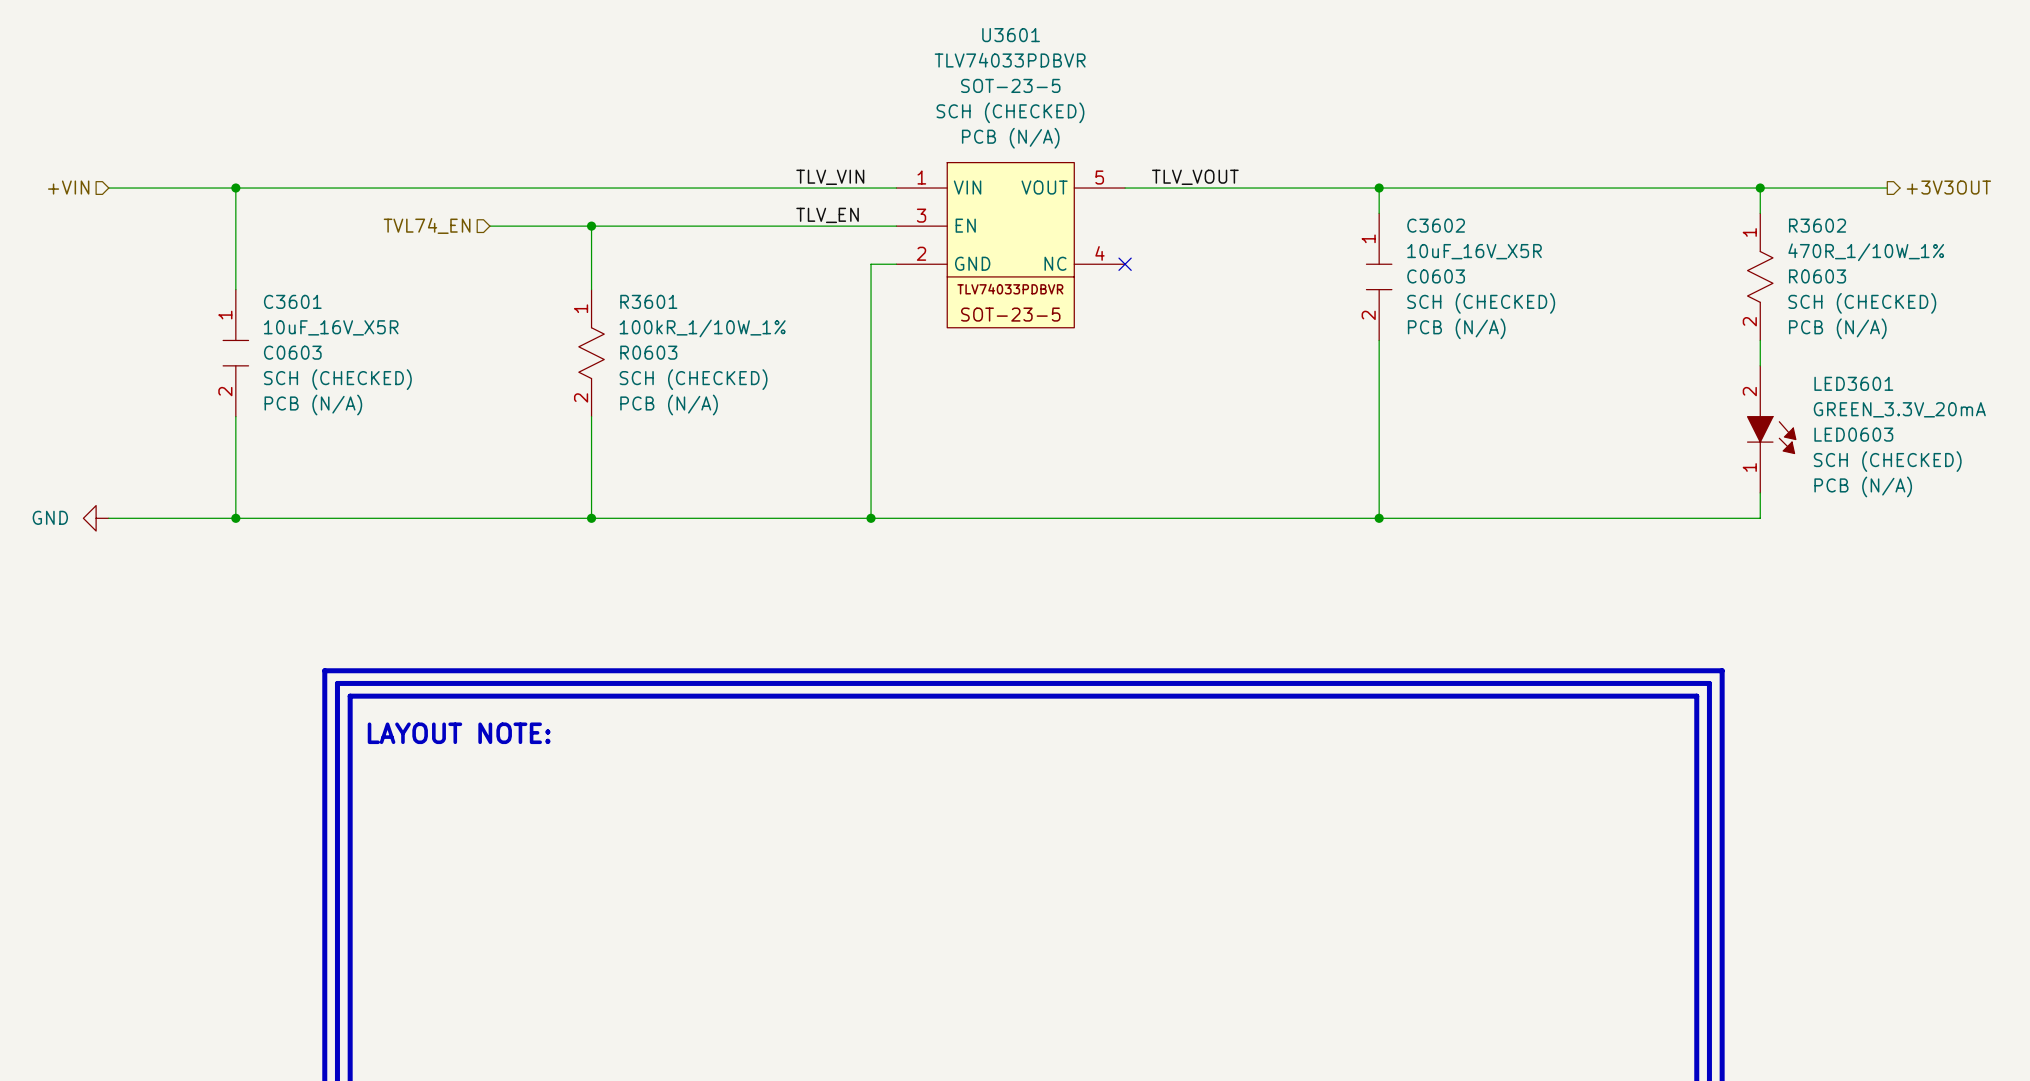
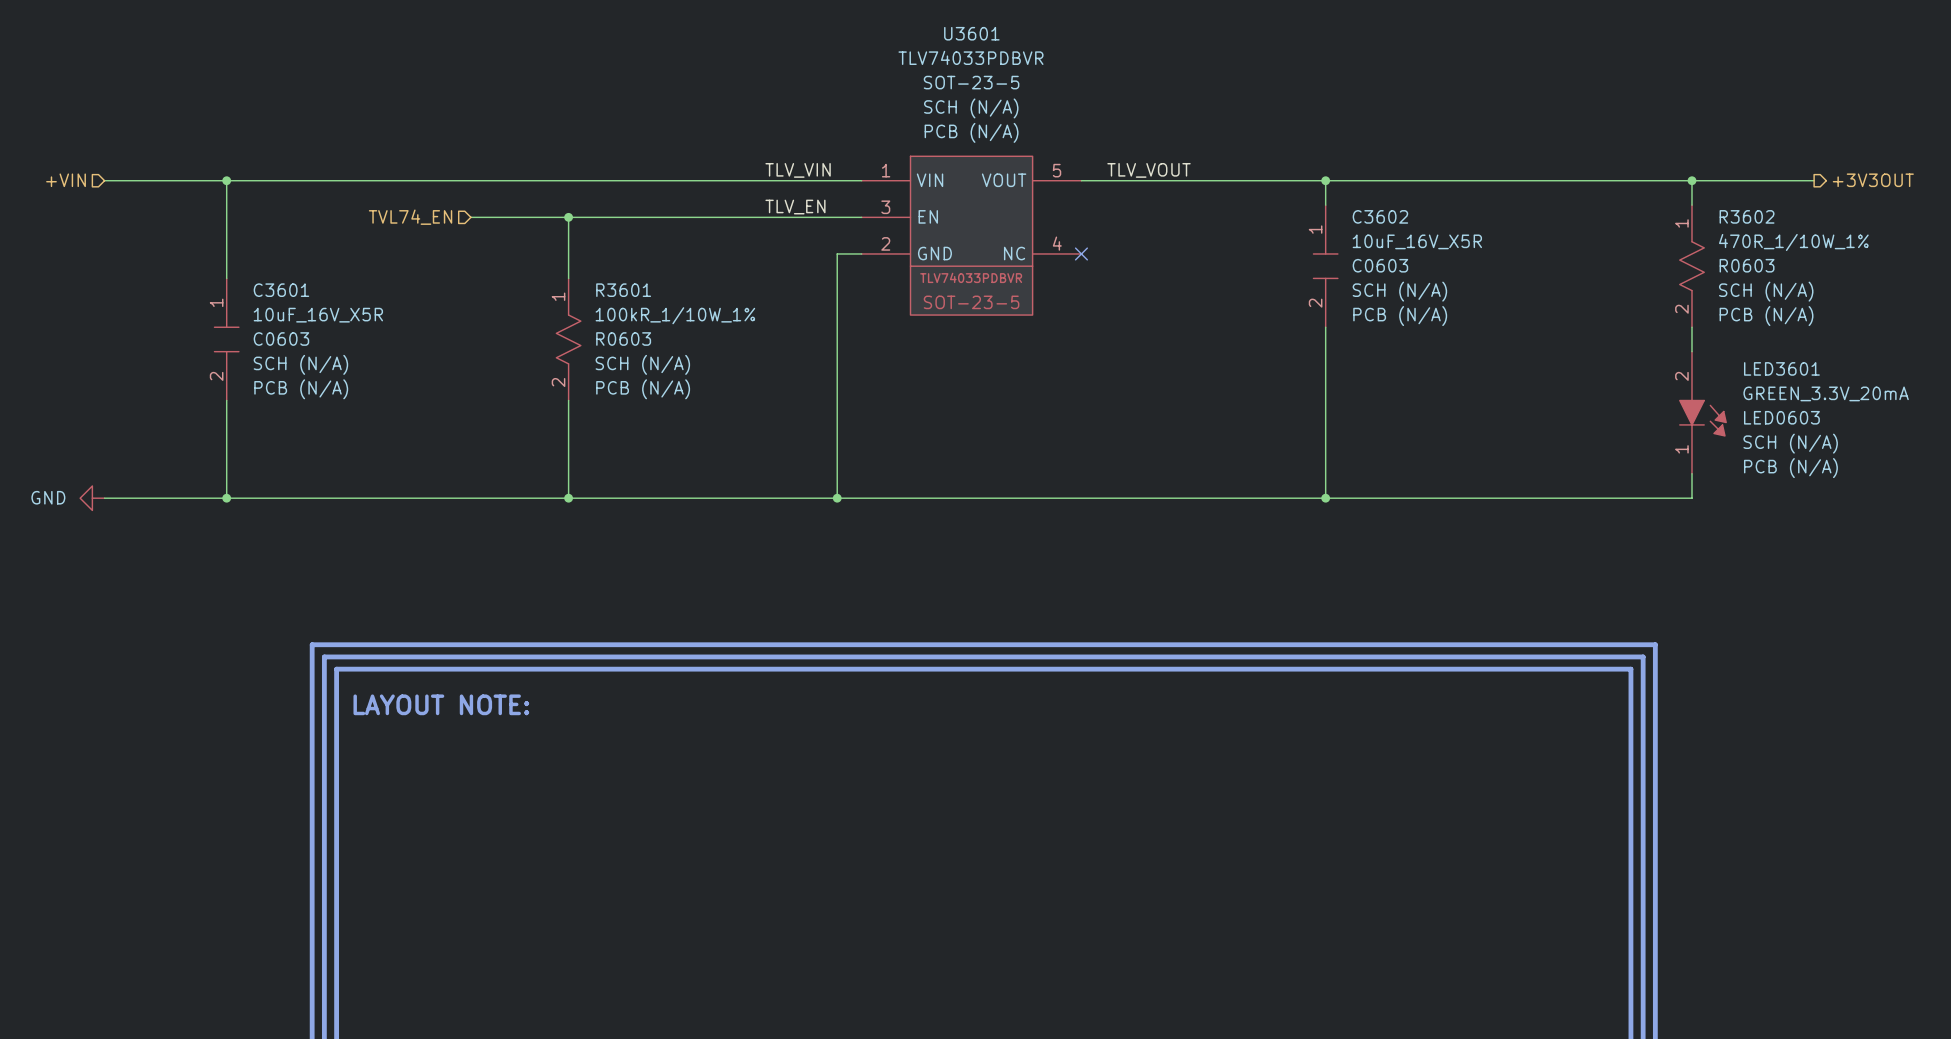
U3601 text: SCH (CHECKED) (1010, 112) -> SCH (N/A) (971, 108)
C3602 text: SCH (CHECKED) (1481, 303) -> SCH (N/A) (1399, 291)
R3602 text: SCH (CHECKED) (1862, 303) -> SCH (N/A) (1766, 291)
C3601 text: SCH (CHECKED) (337, 379) -> SCH (N/A) (300, 364)
R3601 text: SCH (CHECKED) (693, 379) -> SCH (N/A) (642, 364)
LED3601 text: SCH (CHECKED) (1887, 461) -> SCH (N/A) (1790, 443)

